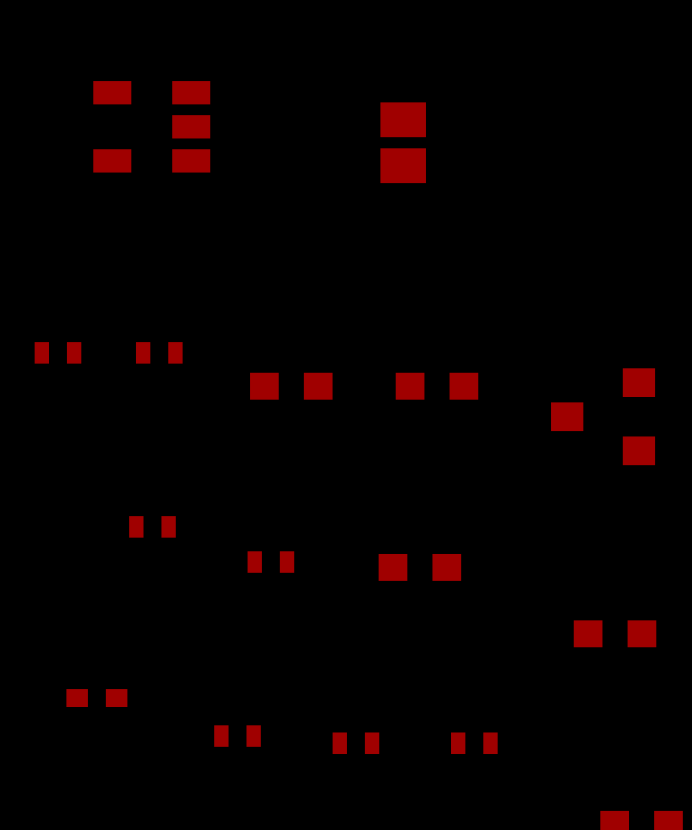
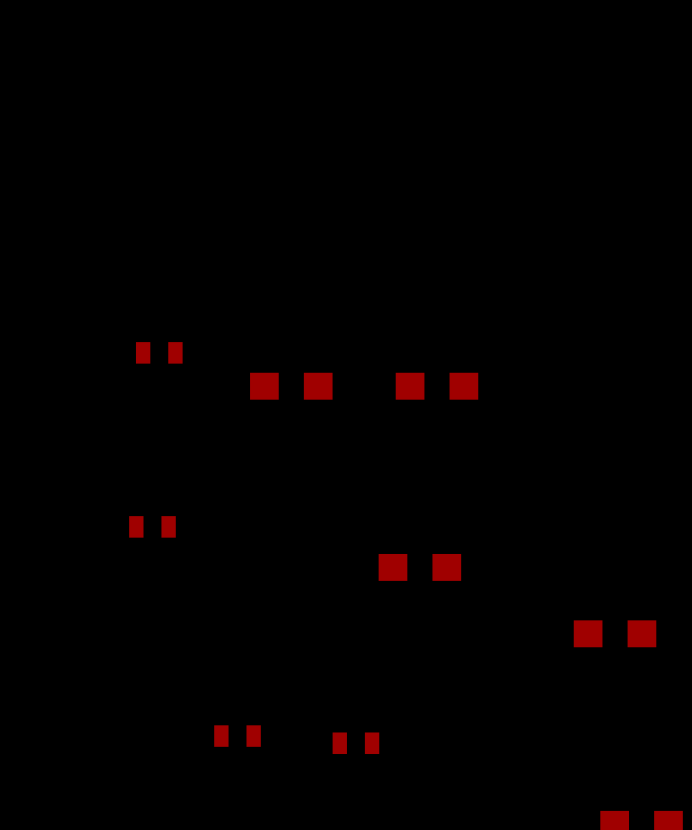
part: (151, 126) -> none
part: (403, 142) -> none
part: (57, 352) -> none
part: (603, 416) -> none
part: (270, 562) -> none
part: (96, 698) -> none
part: (474, 743) -> none

